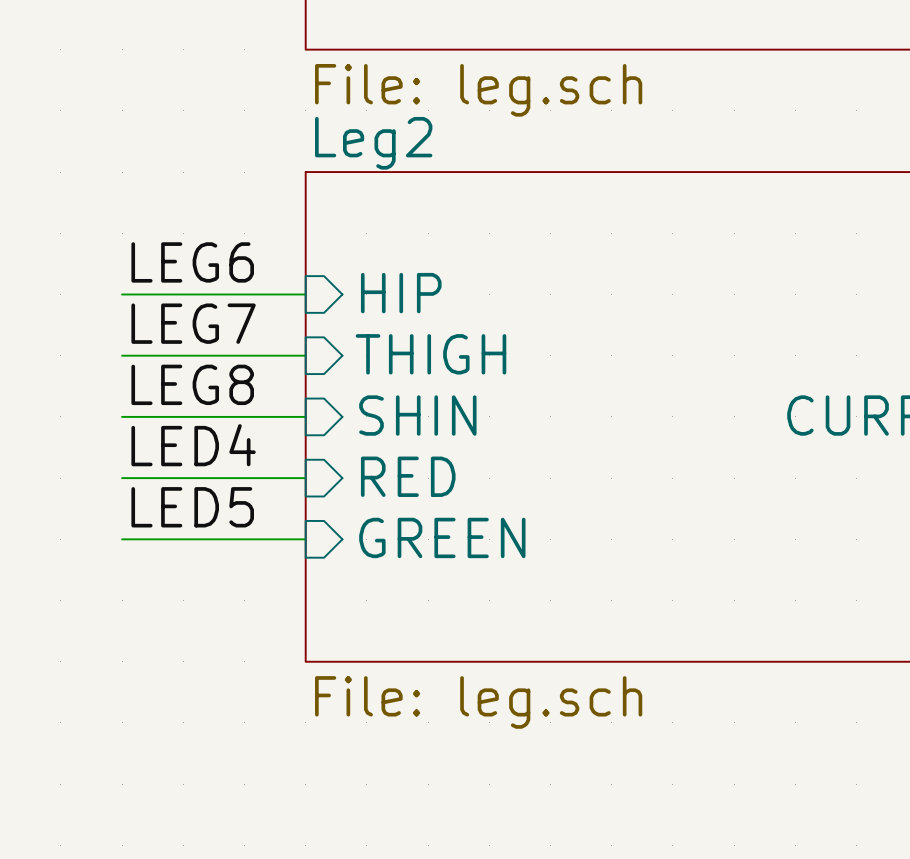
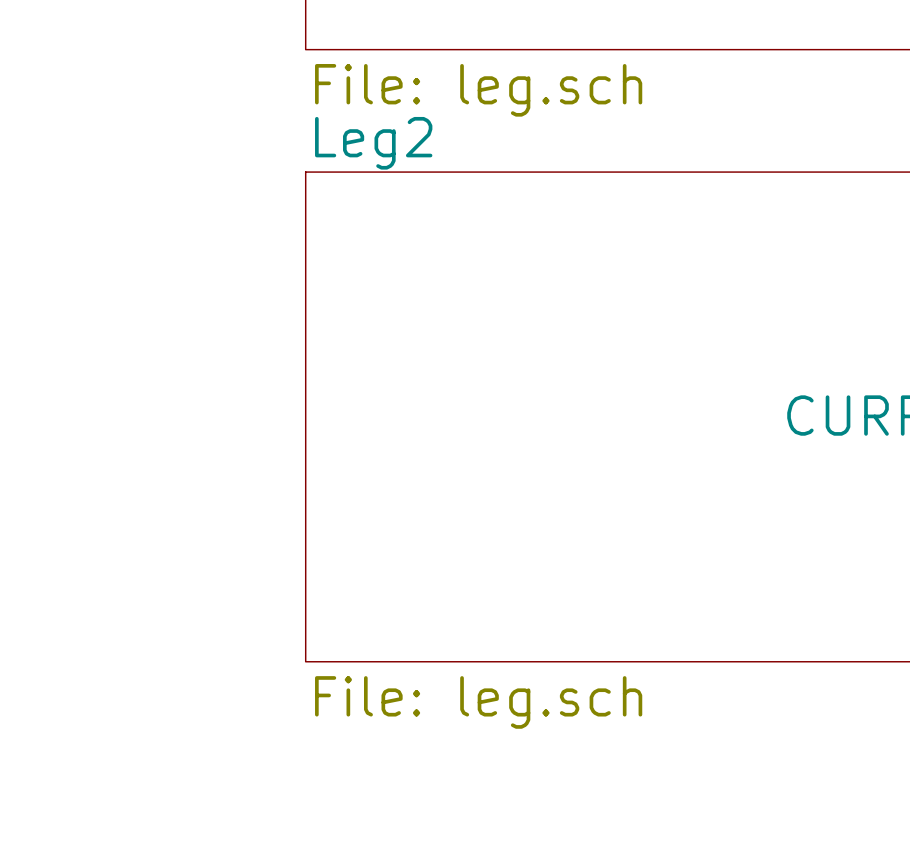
label: LEG6 (192, 262) -> none
sheet pin: HIP (401, 293) -> none
wire: (122, 294) (305, 294) -> none
label: LEG7 (193, 323) -> none
sheet pin: THIGH (430, 354) -> none
wire: (122, 355) (305, 355) -> none
label: LEG8 (192, 384) -> none
sheet pin: SHIN (417, 415) -> none
wire: (122, 416) (305, 416) -> none
label: LED4 (193, 445) -> none
sheet pin: RED (408, 476) -> none
wire: (122, 478) (305, 478) -> none
label: LED5 (192, 507) -> none
sheet pin: GREEN (442, 537) -> none
wire: (122, 539) (305, 539) -> none

